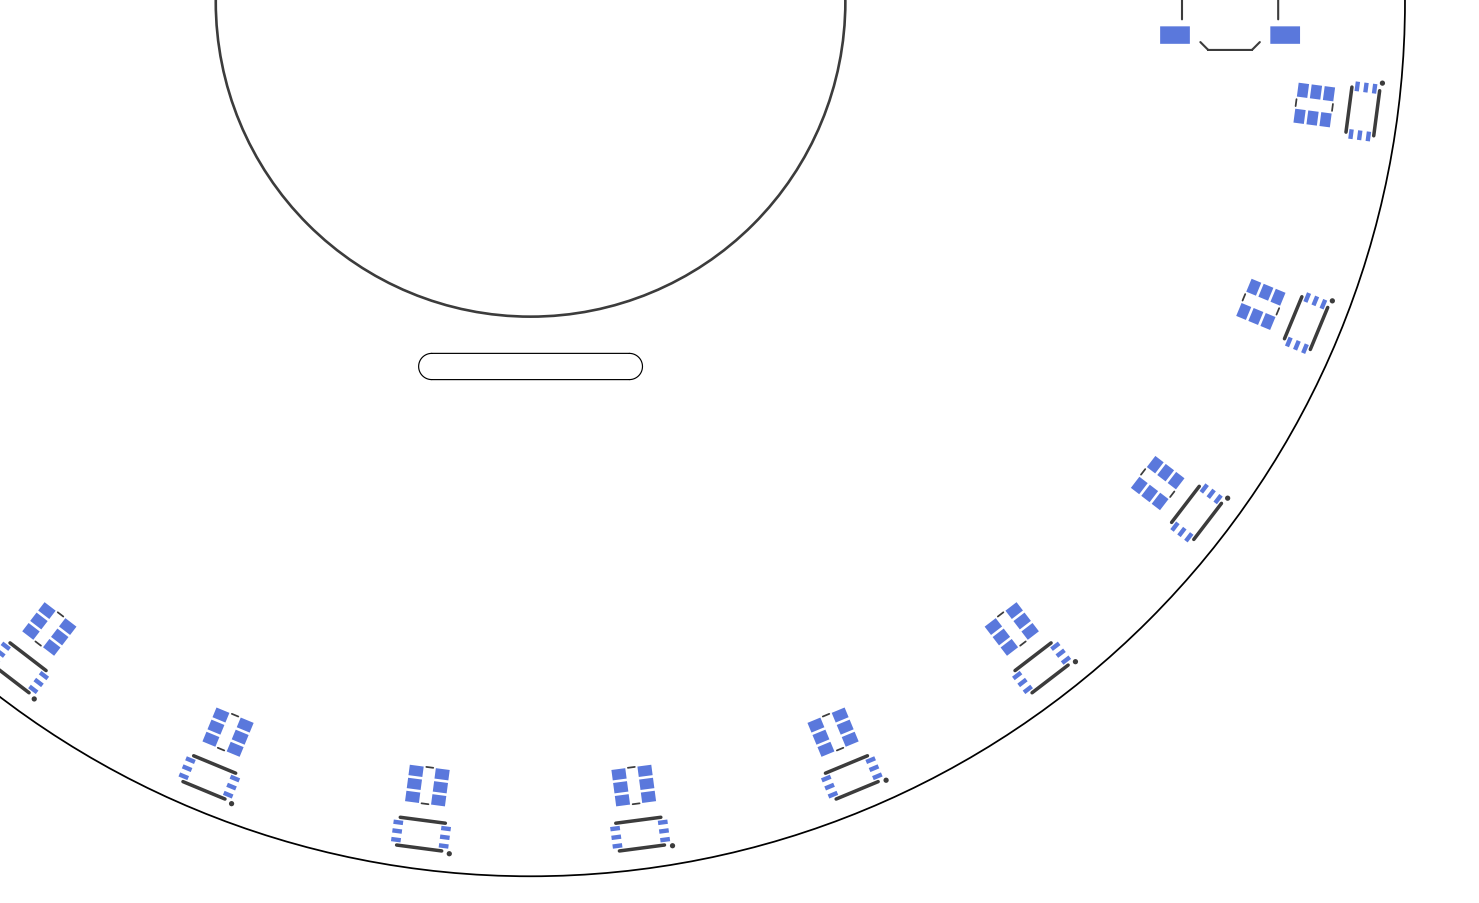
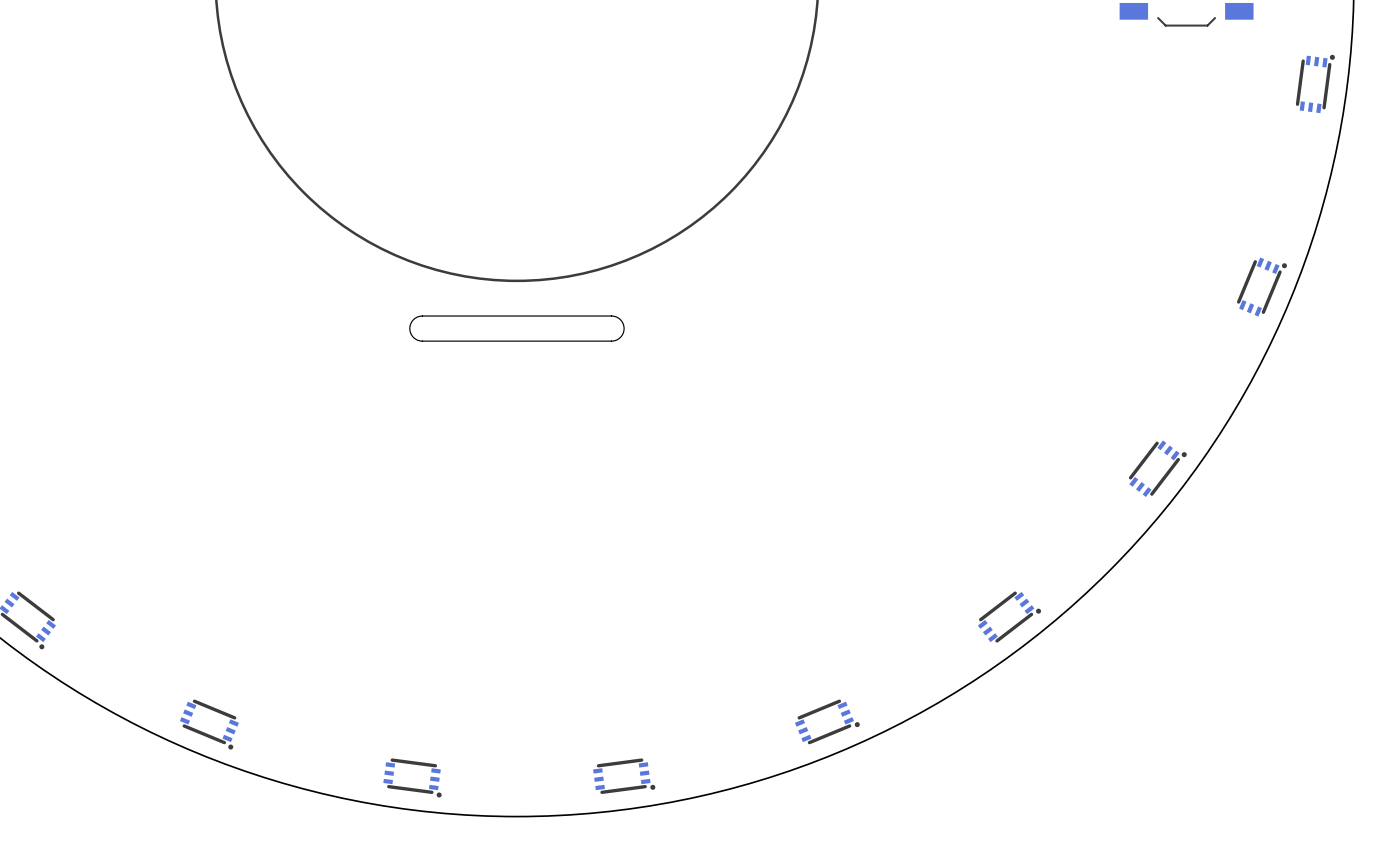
part: (1314, 105) -> none
part: (1260, 304) -> none
part: (1157, 483) -> none
part: (49, 628) -> none
part: (1011, 628) -> none
part: (228, 732) -> none
part: (833, 732) -> none
part: (427, 785) -> none
part: (633, 785) -> none

